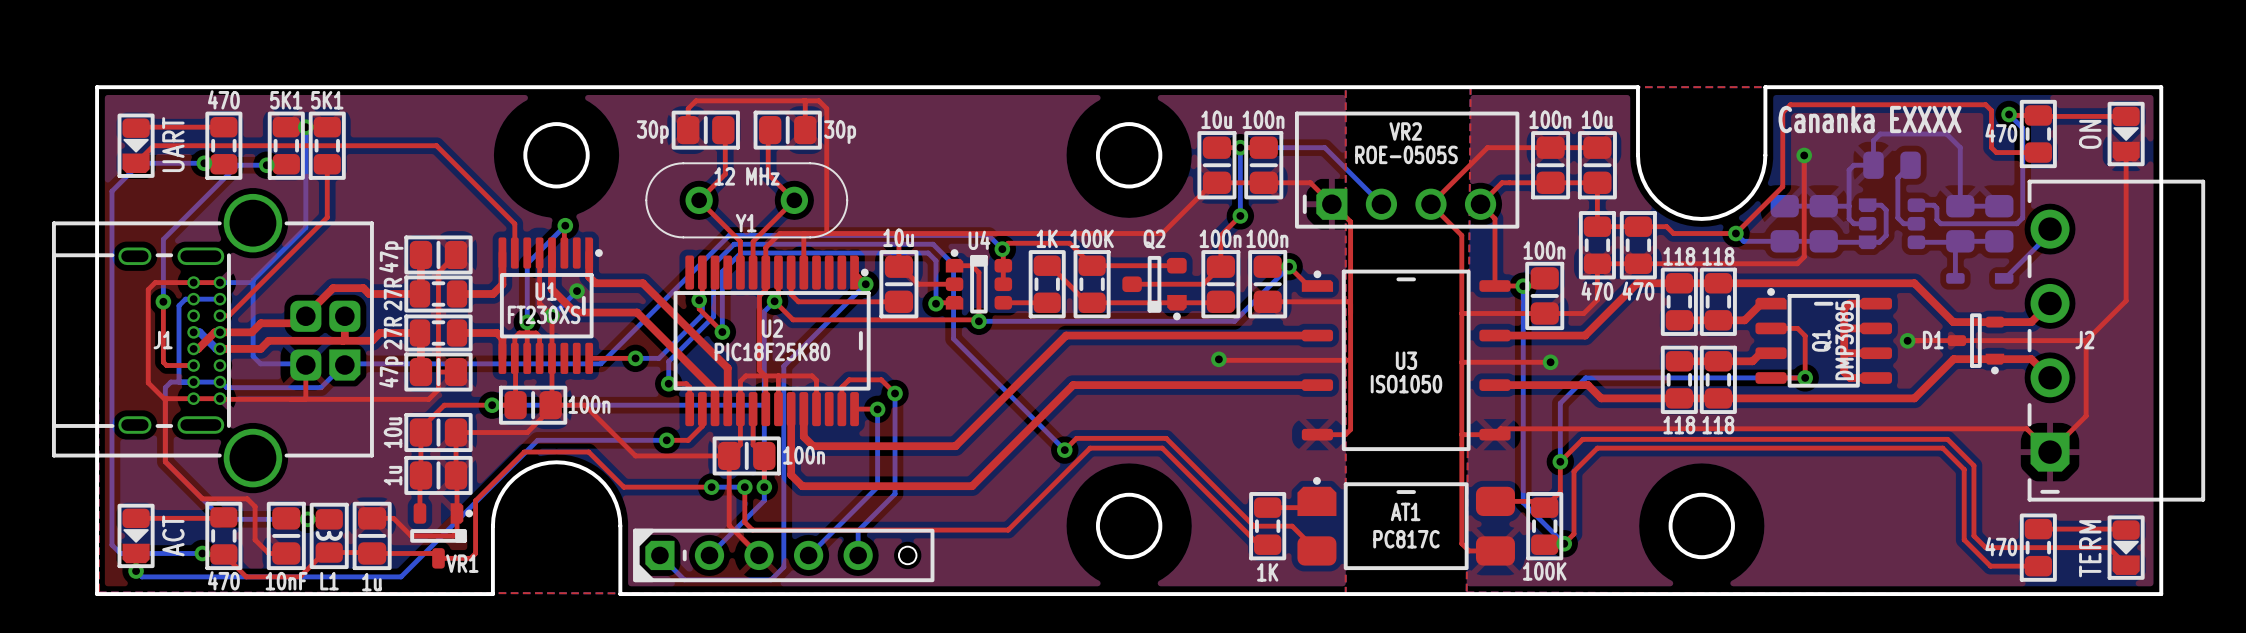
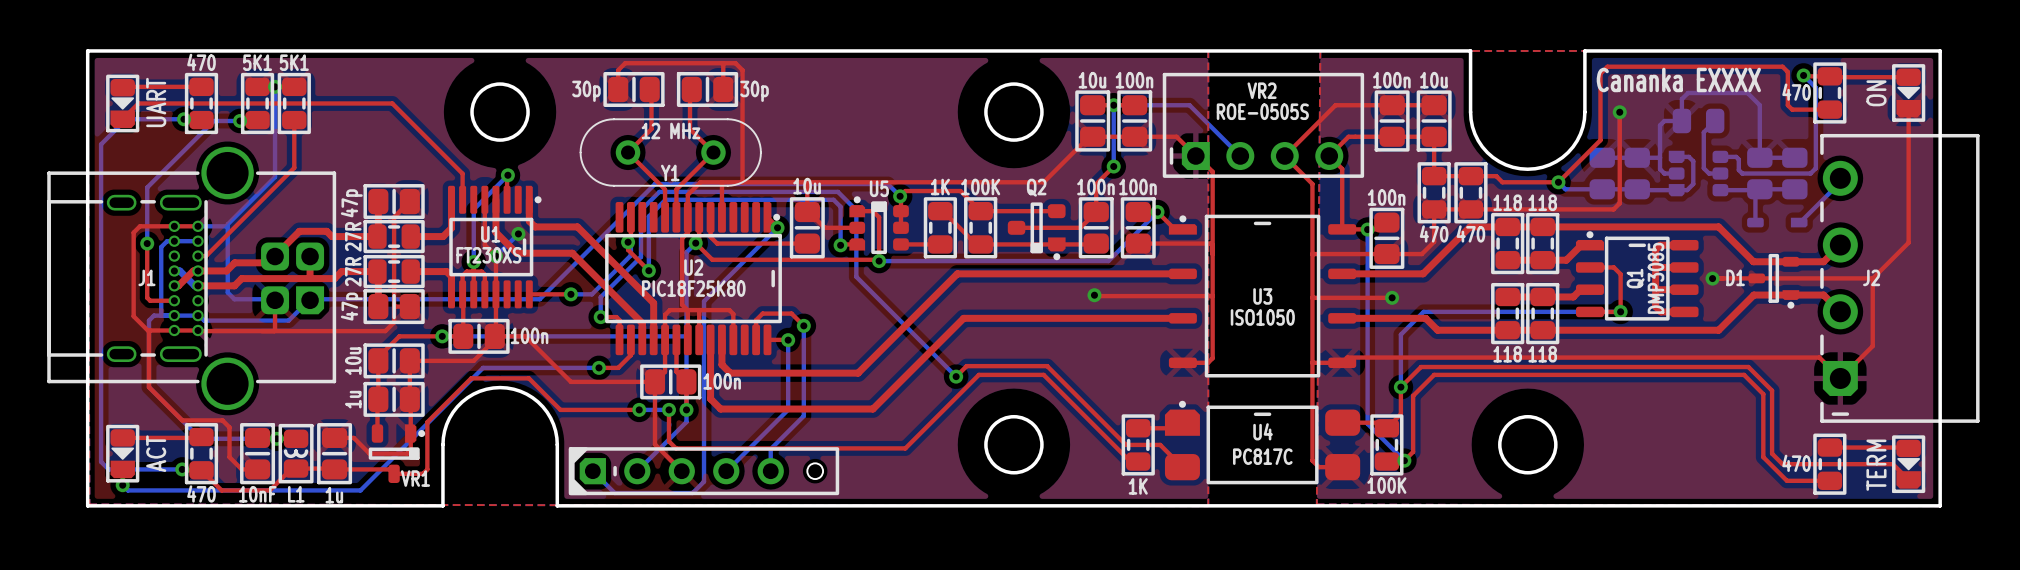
U4 name: U4 (979, 240) -> U5 (879, 188)
AT1 name: AT1 (1405, 511) -> U4 (1263, 431)

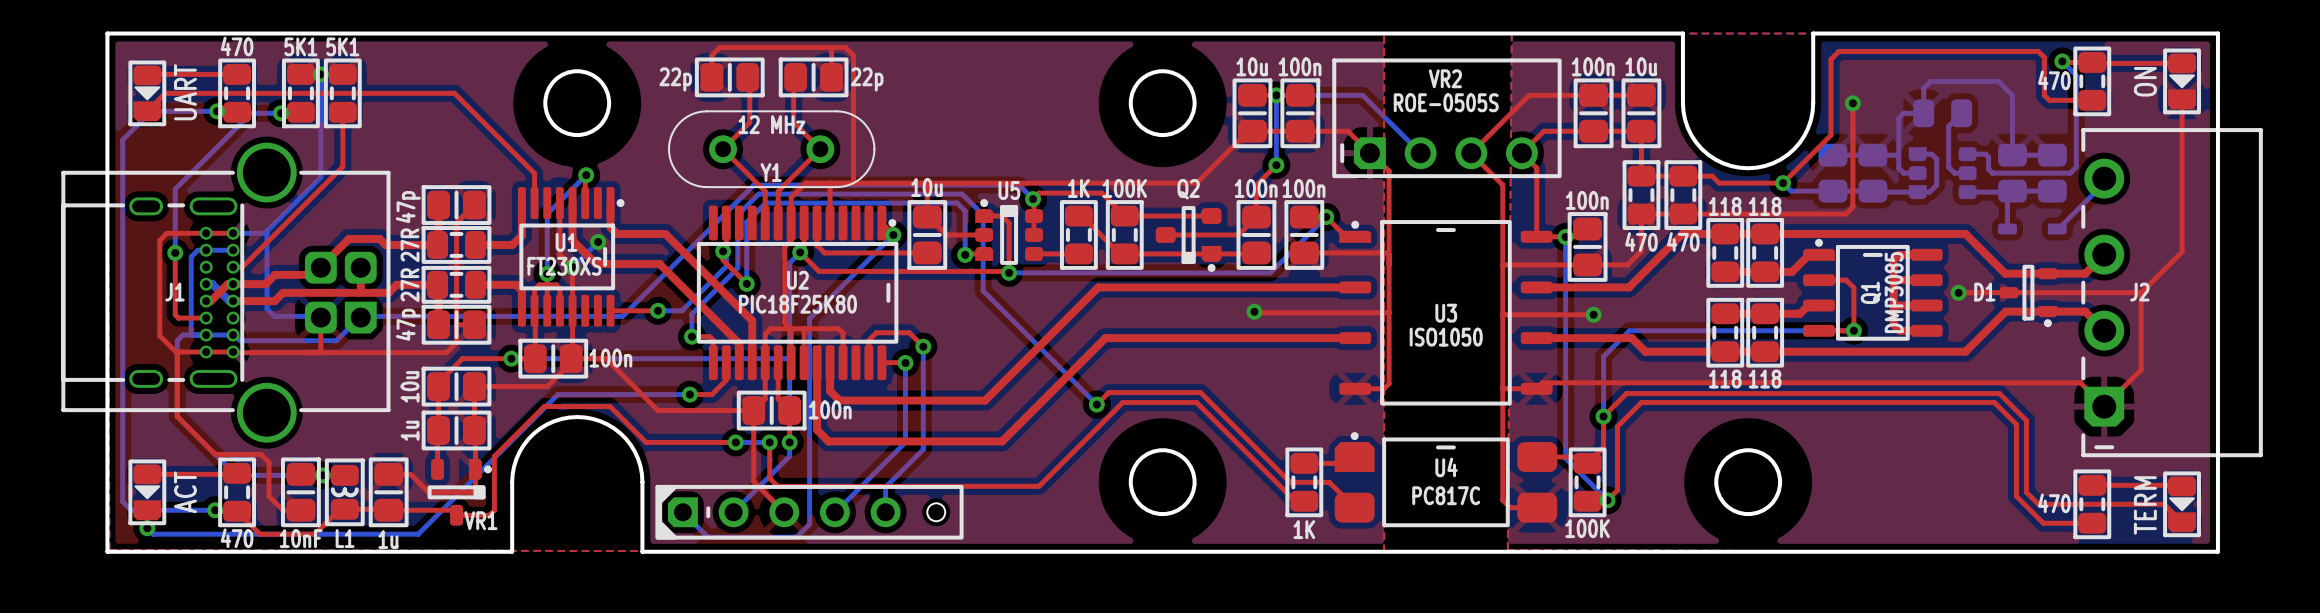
text: Cananka EXXXX (1678, 79) -> none
part value: 30p (586, 91) -> 22p (675, 79)
part value: 30p (754, 91) -> 22p (867, 79)

